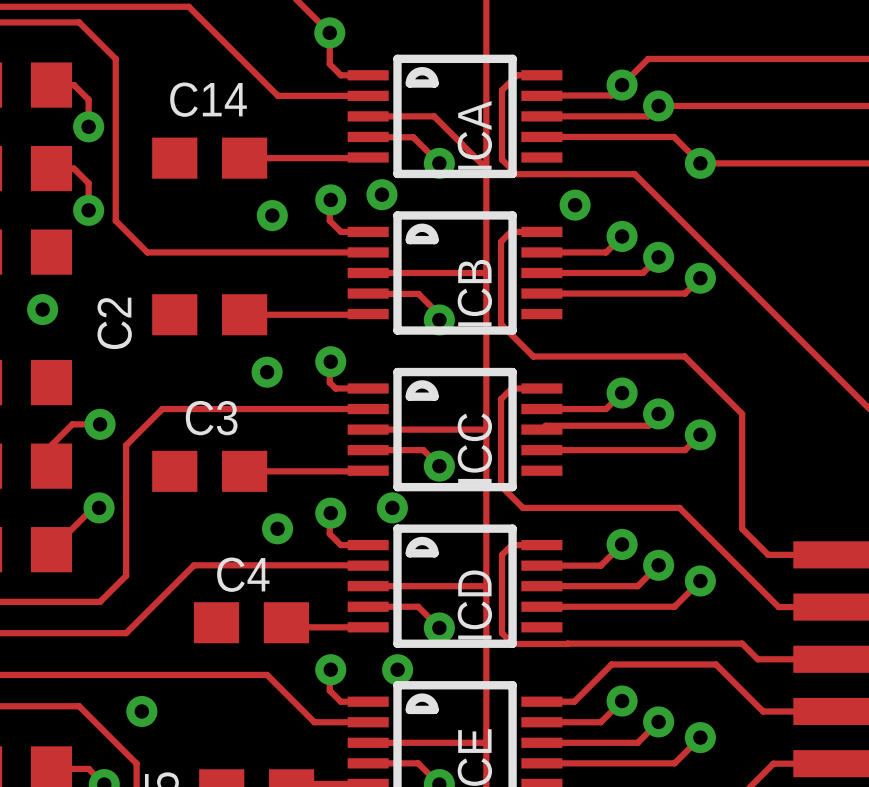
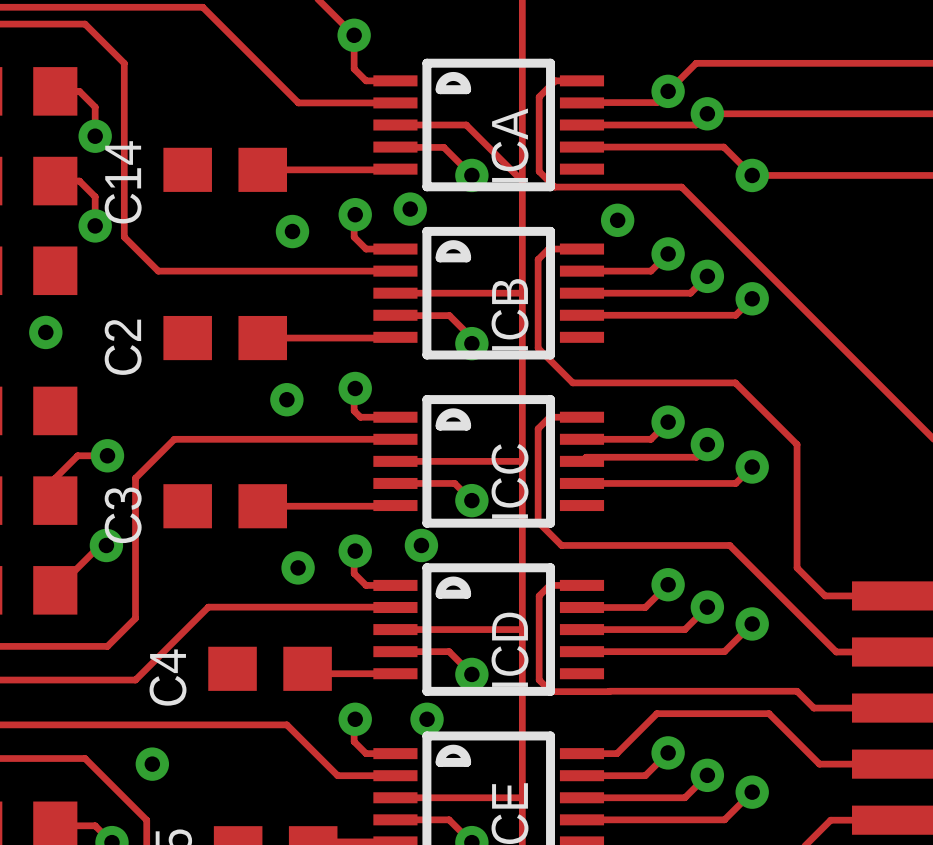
C14 name rotation: 0° (208, 99) -> 90° counterclockwise (123, 182)
C14 name position: C14 (208, 99) -> C14 (123, 182)
C3 name rotation: 0° (211, 418) -> 90° counterclockwise (123, 515)
C3 name position: C3 (211, 418) -> C3 (123, 515)
C4 name rotation: 0° (243, 574) -> 90° counterclockwise (168, 677)
C4 name position: C4 (243, 574) -> C4 (168, 677)

